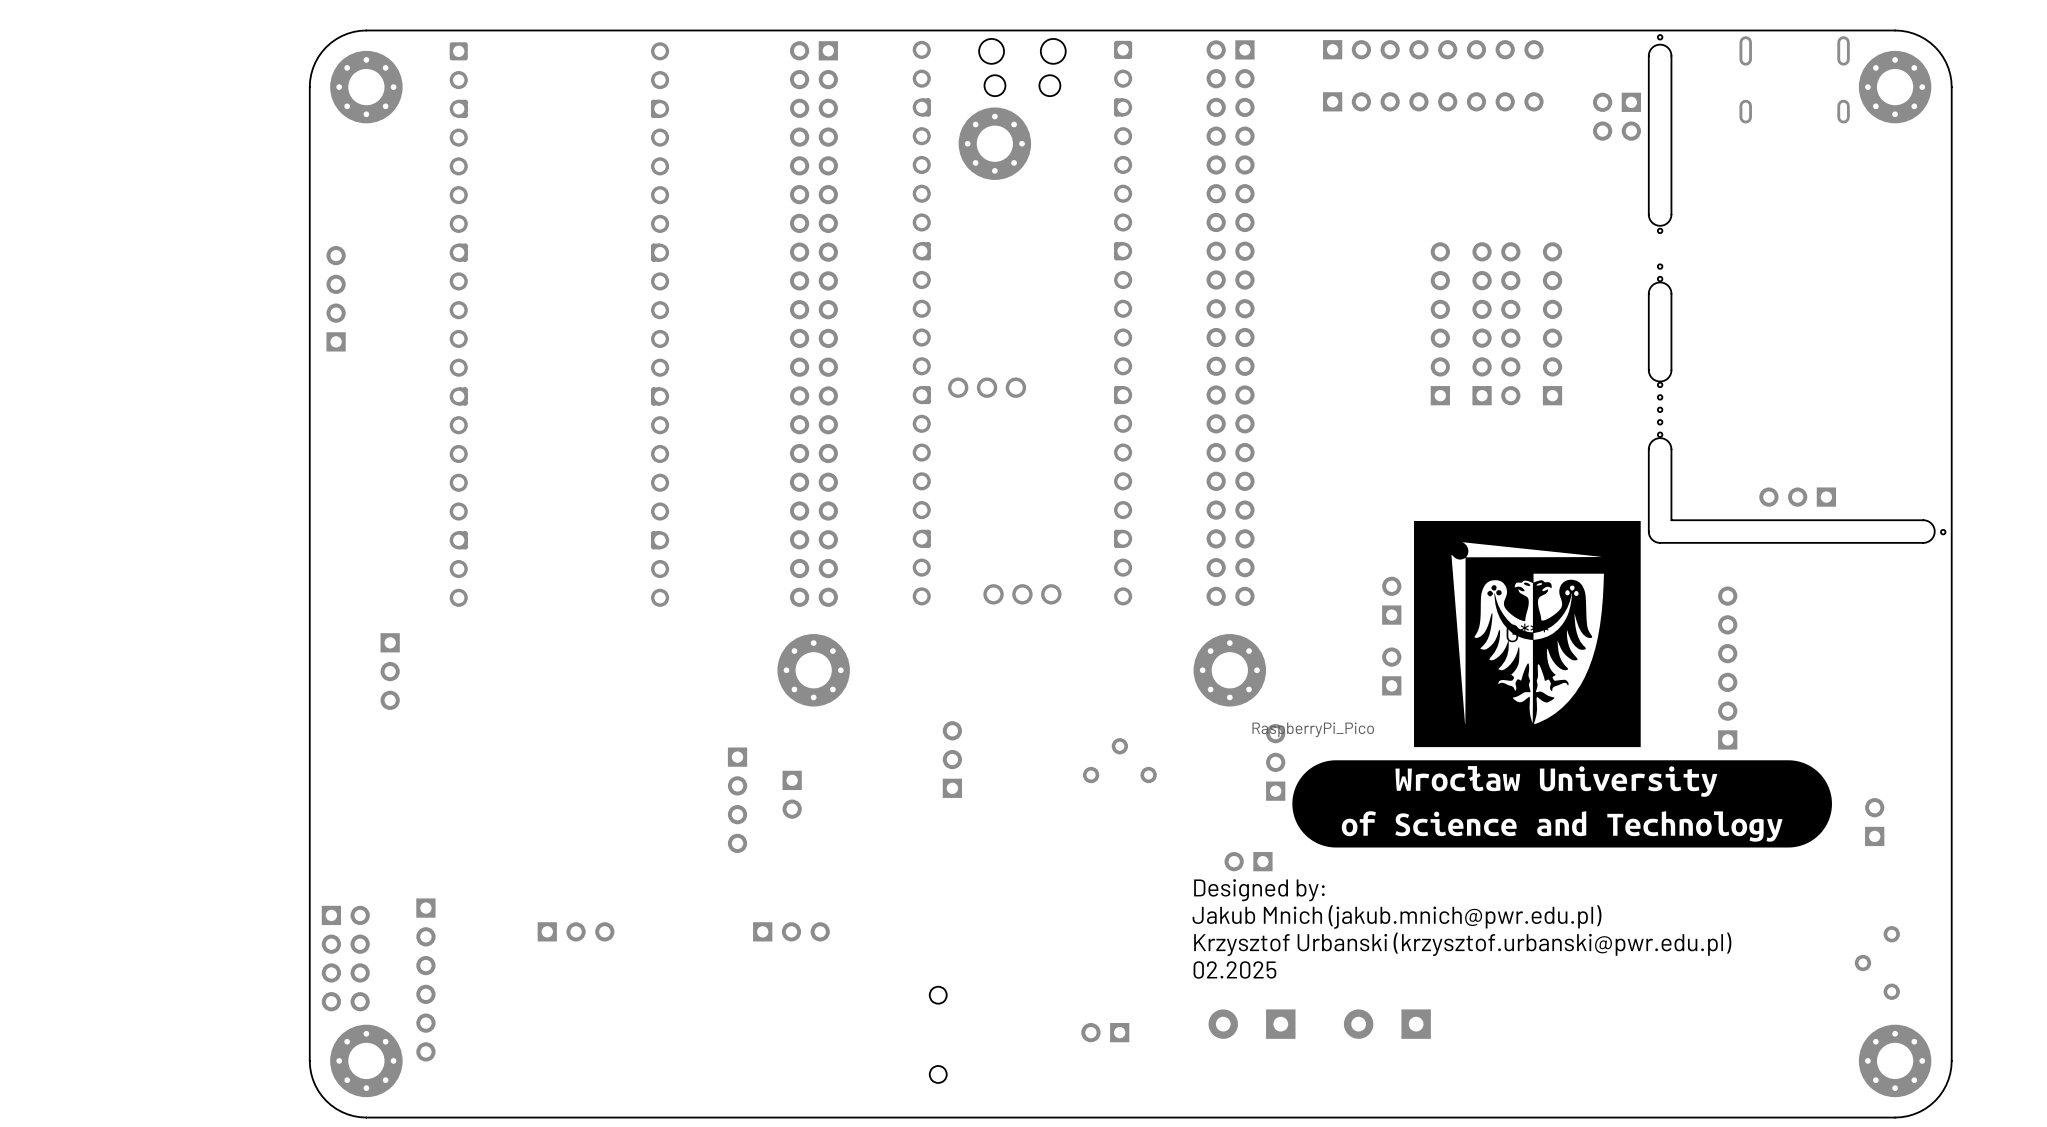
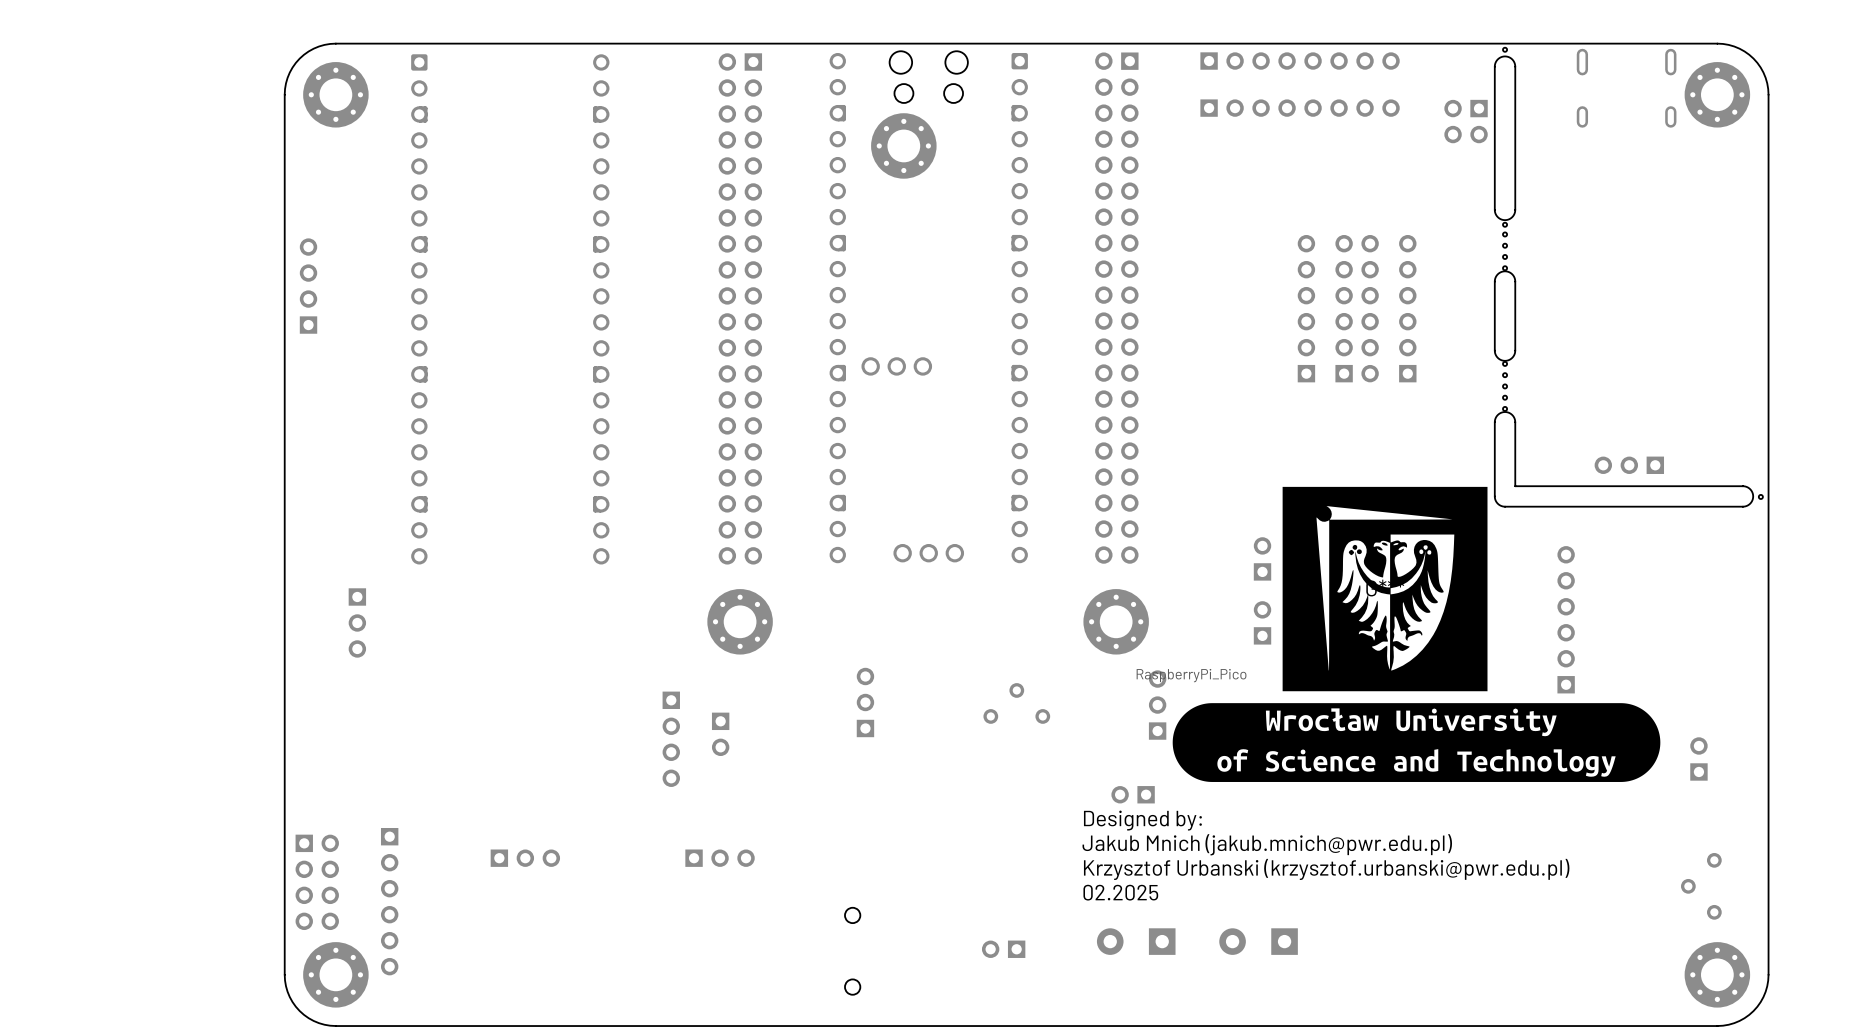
part: none -> (1505, 234)
part: none -> (1505, 245)

